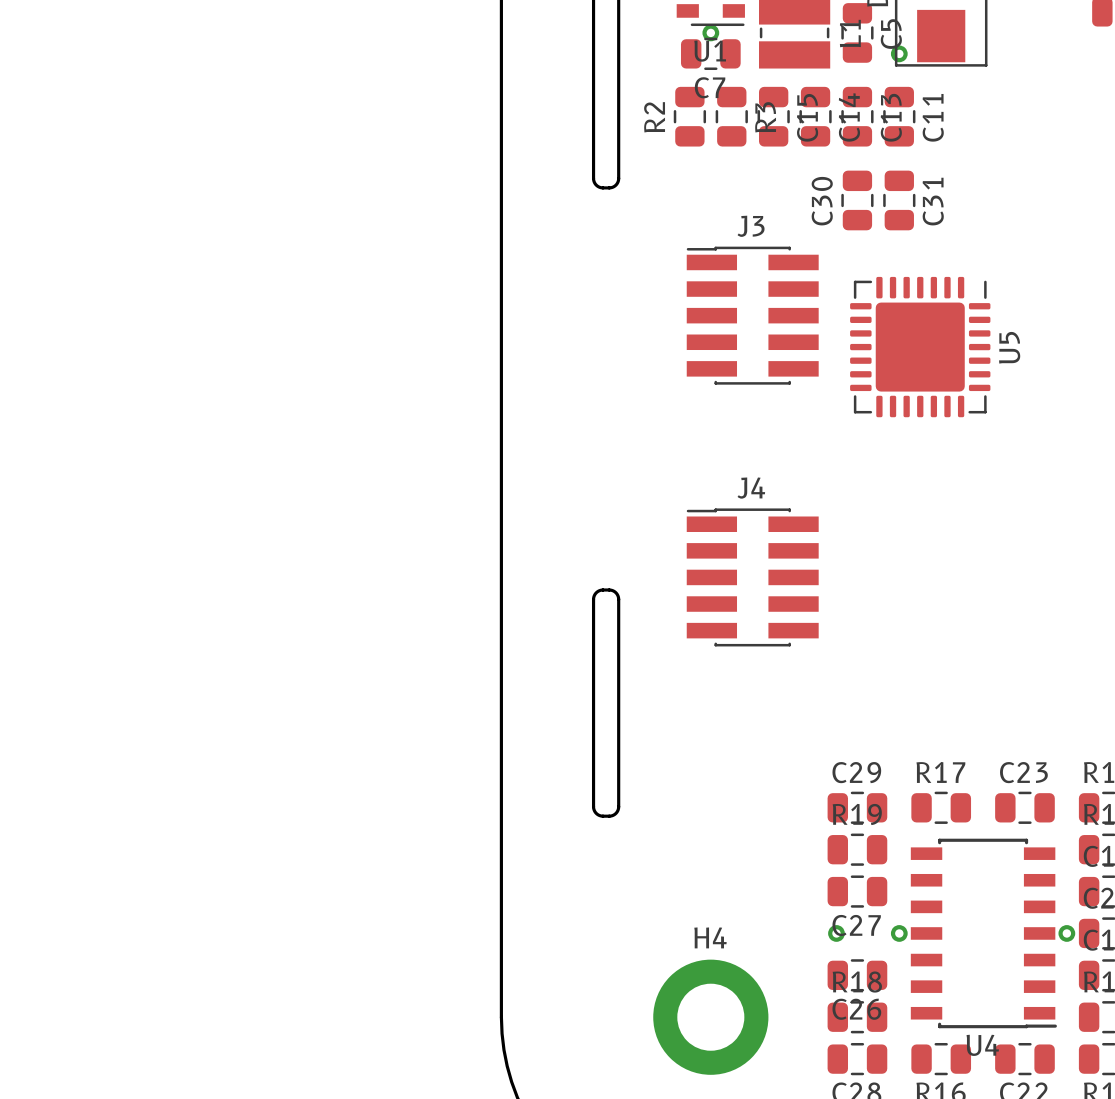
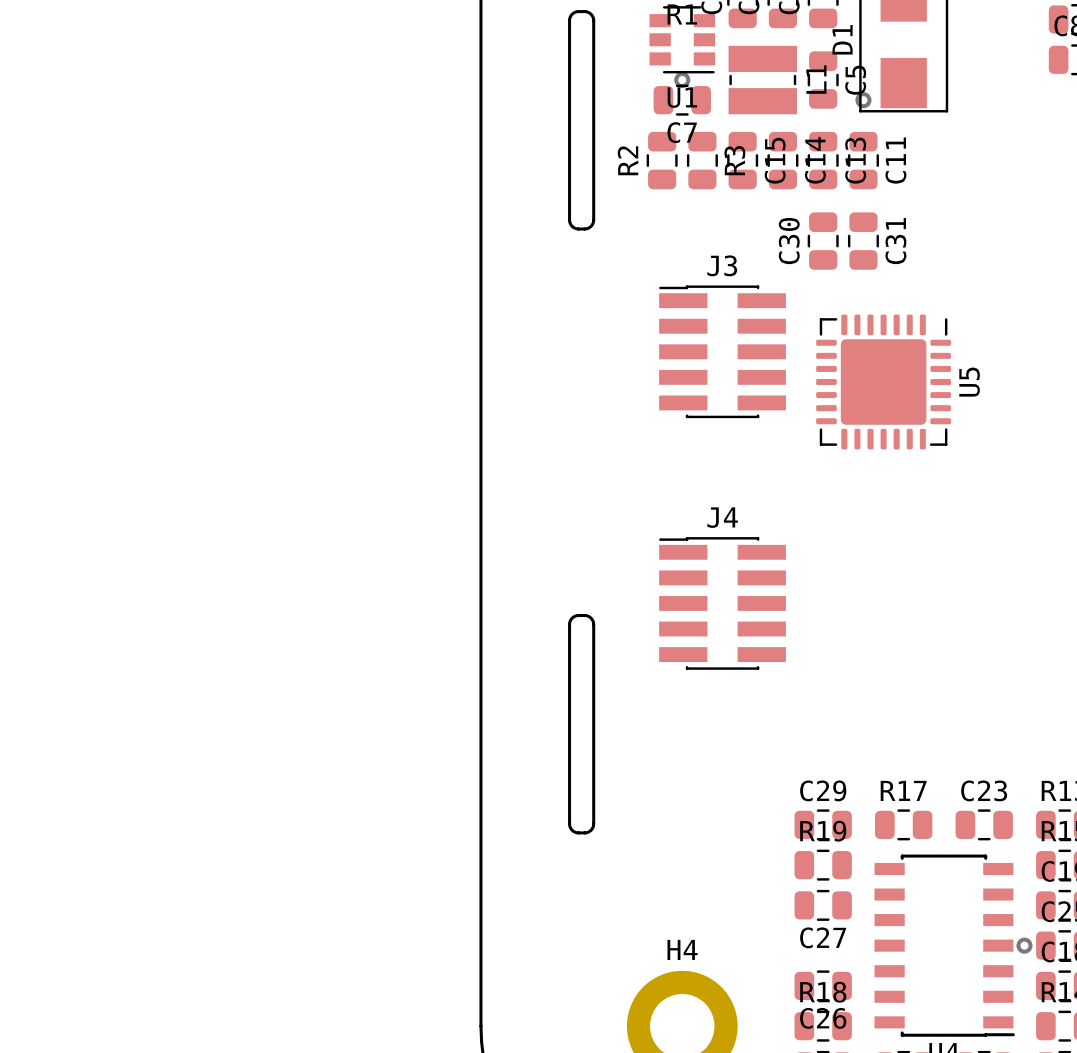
via: (836, 933) -> none
via: (899, 933) -> none

